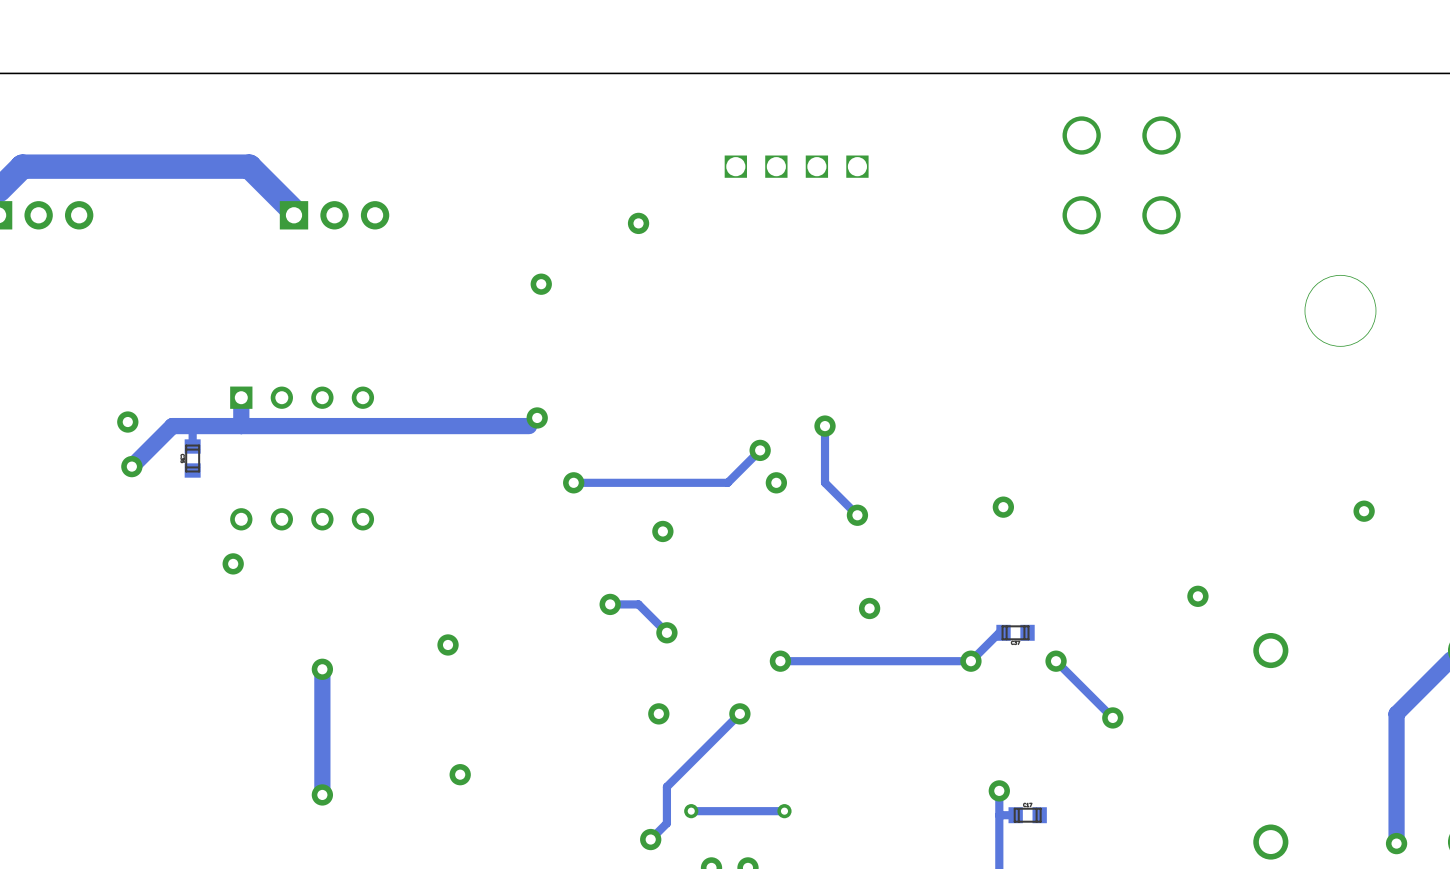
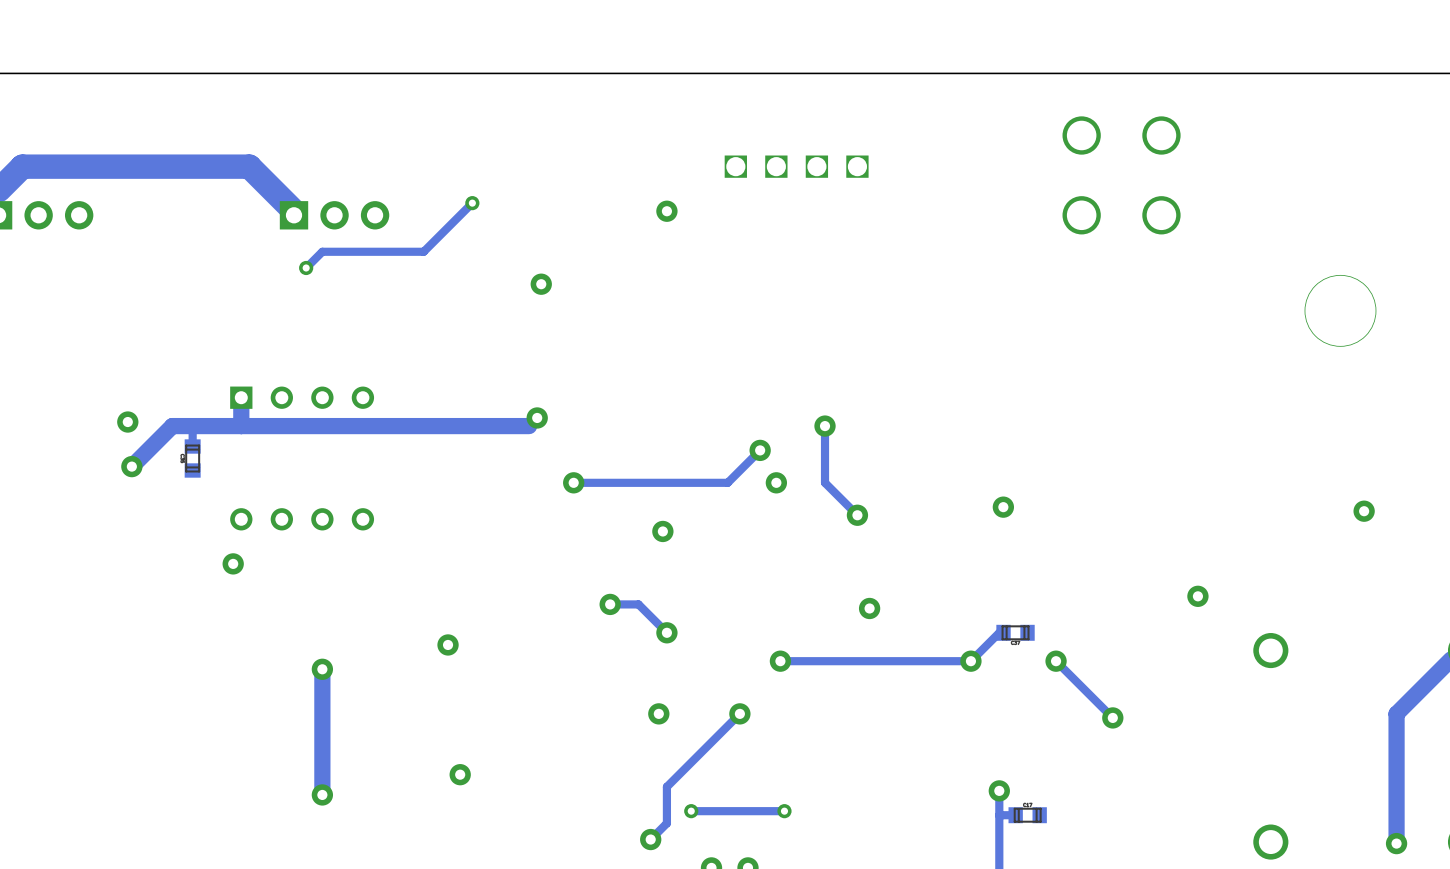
track: none -> (472, 203) (423, 251) (322, 251) (306, 267)
via: none -> (472, 203)
via position: (638, 223) -> (666, 211)
via: none -> (306, 267)

